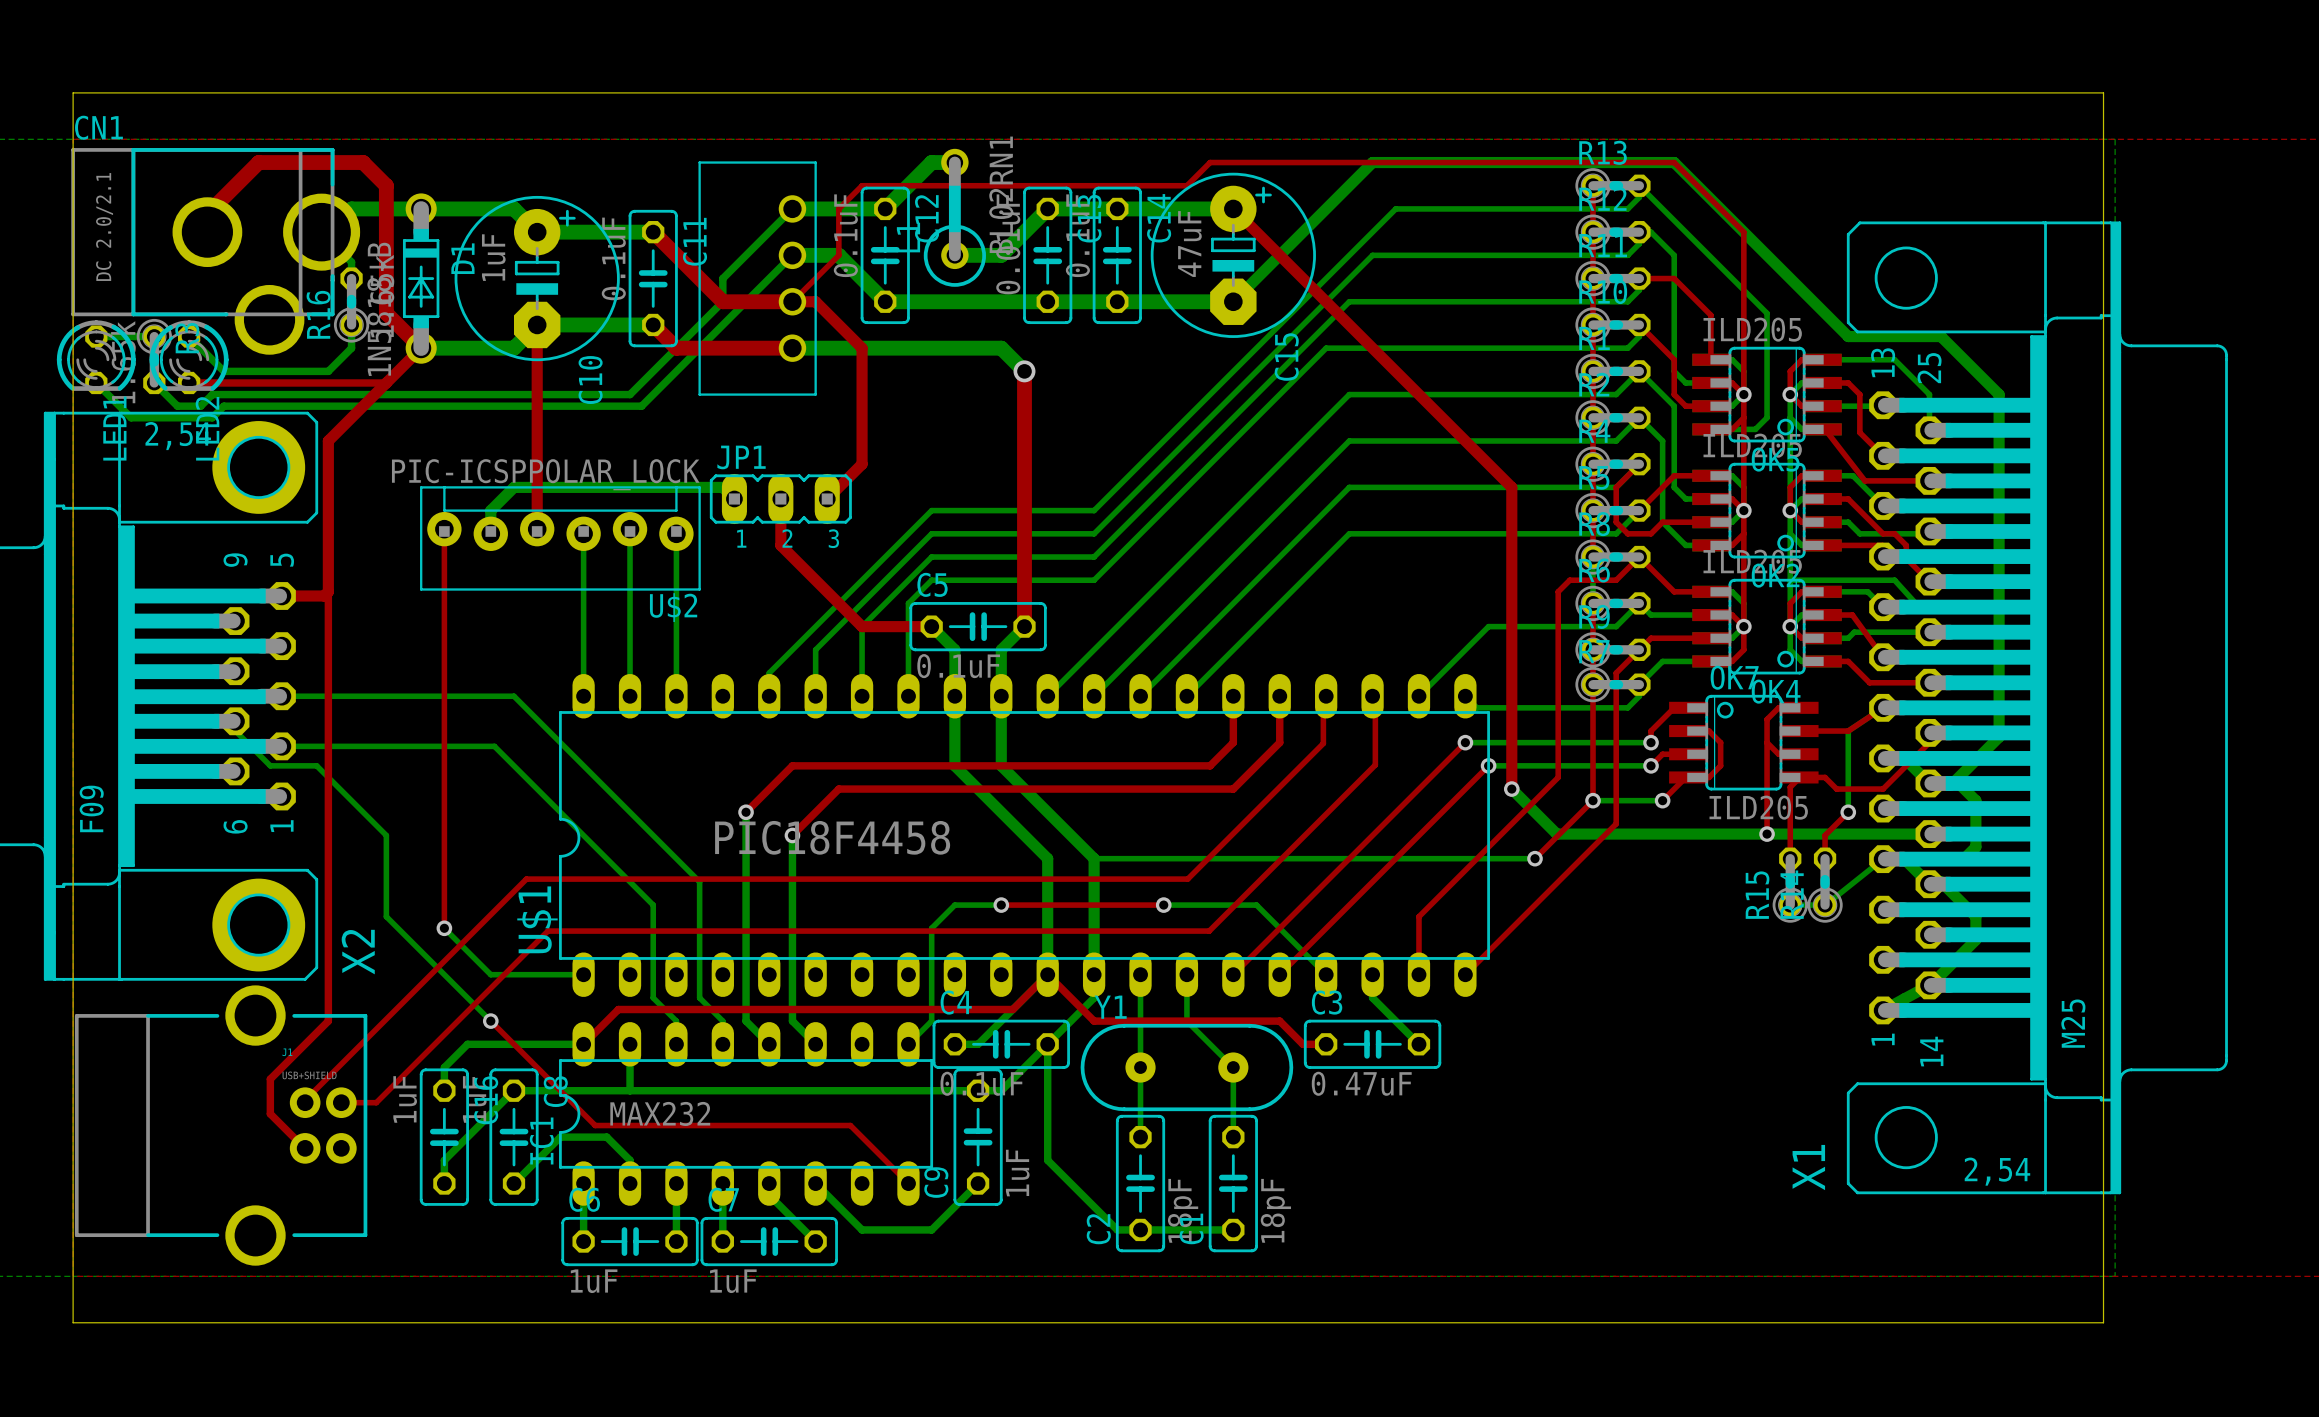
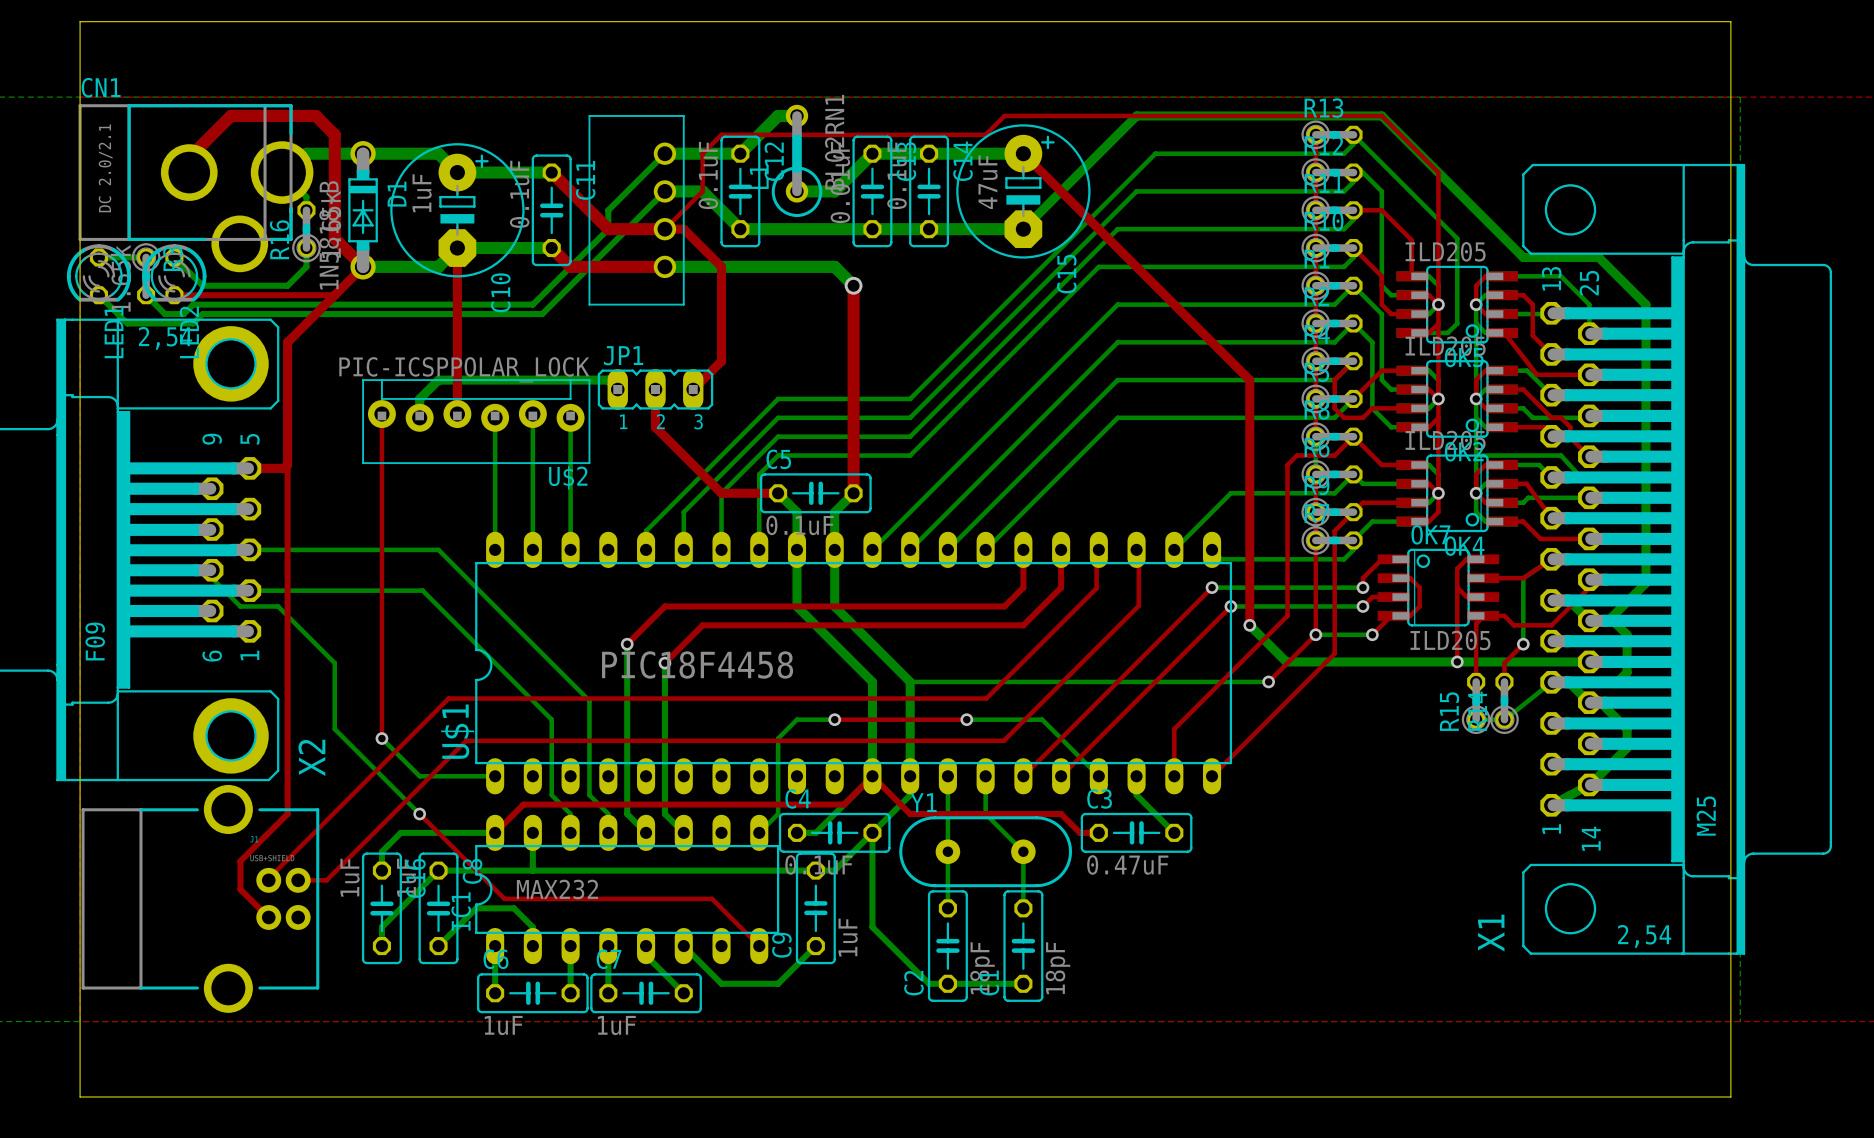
board edge: (73, 92) (2103, 92) -> (80, 59) (80, 21) (1730, 21) (1730, 59)
board edge: (73, 1322) (2103, 1322) -> (80, 1059) (80, 1097) (1730, 1097) (1730, 1059)

